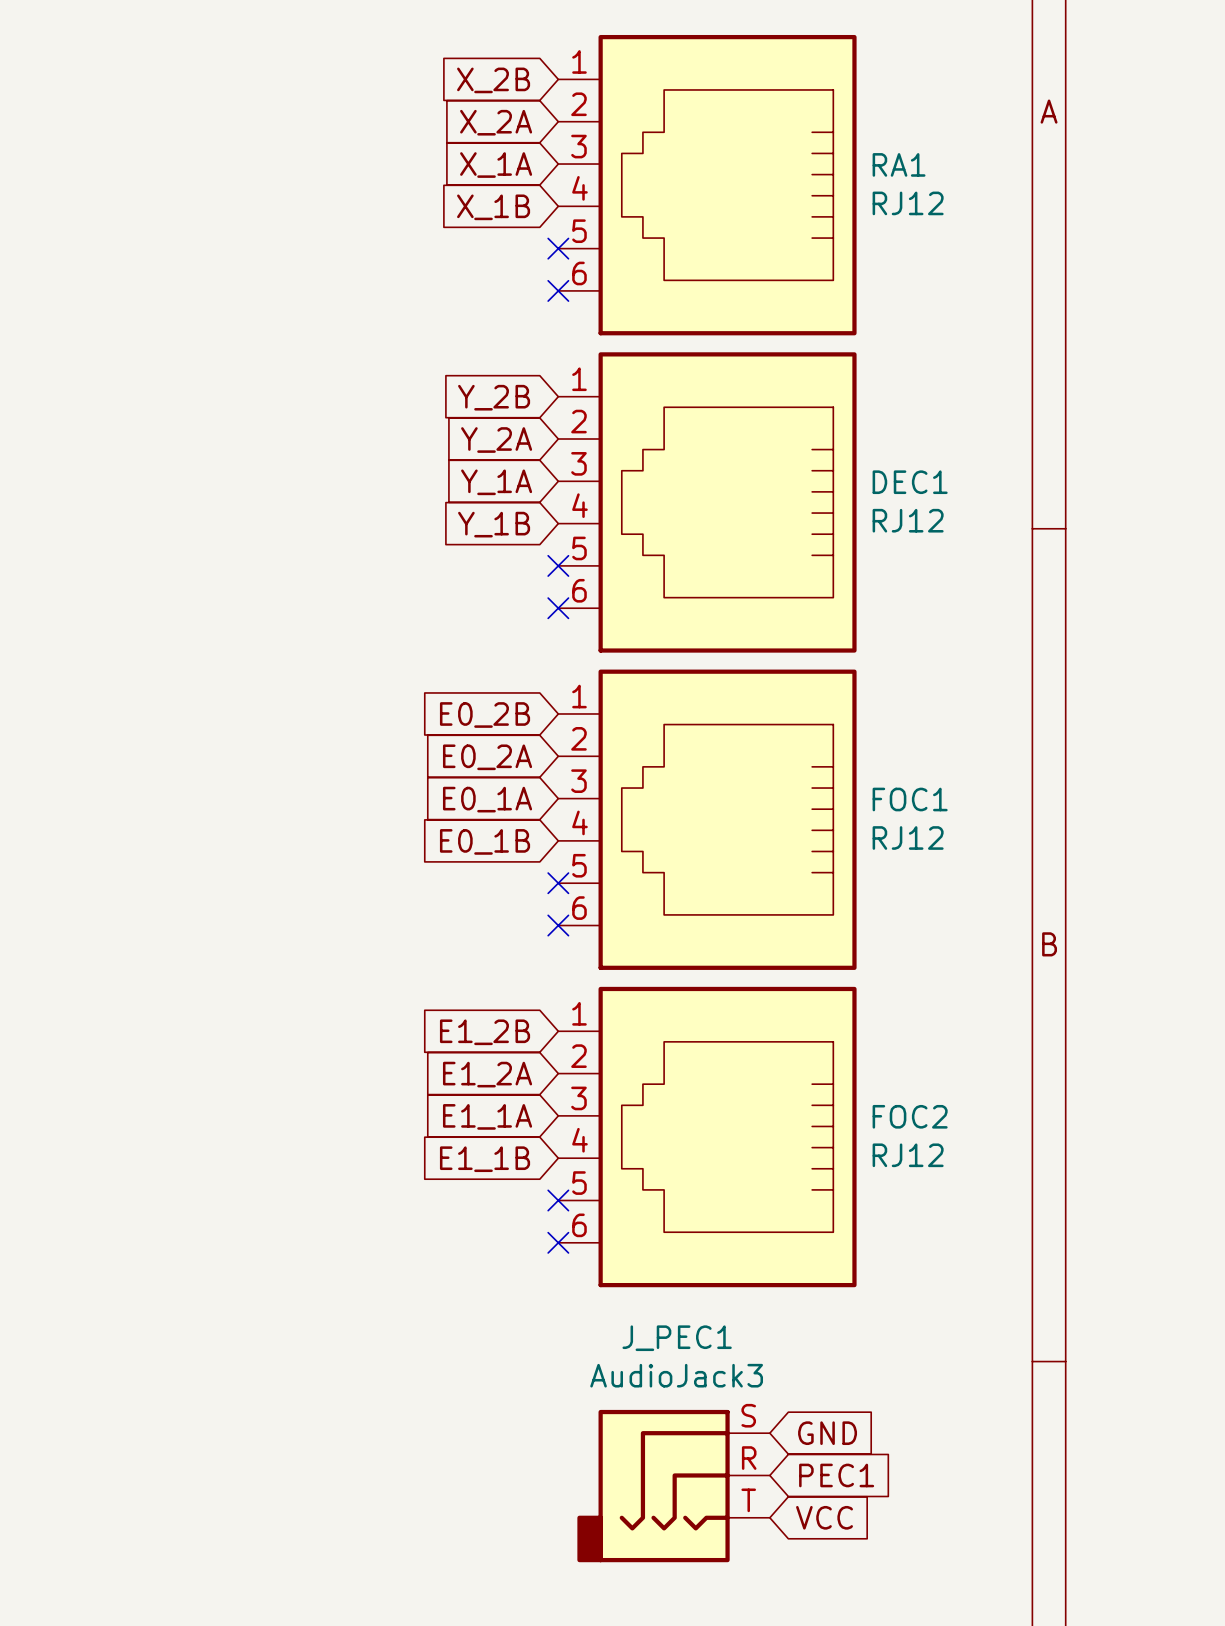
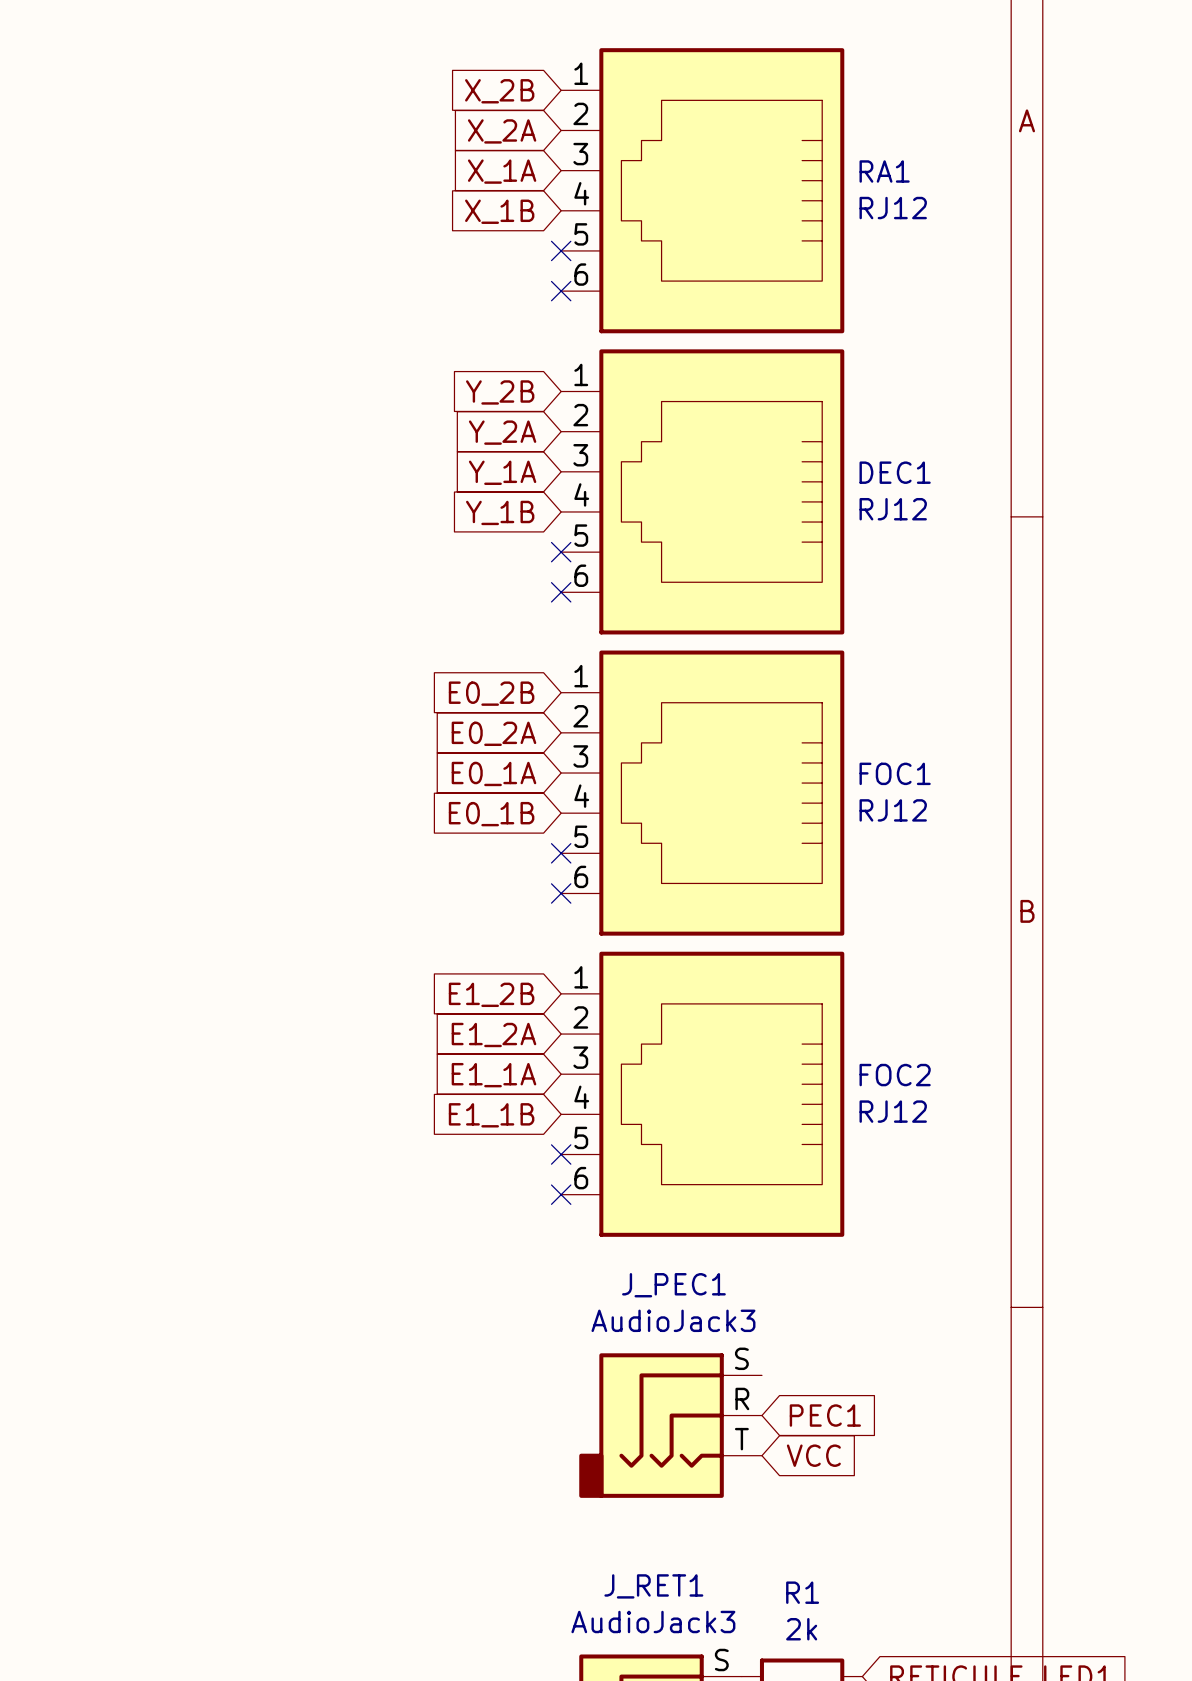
global label: GND (827, 1433) -> none

